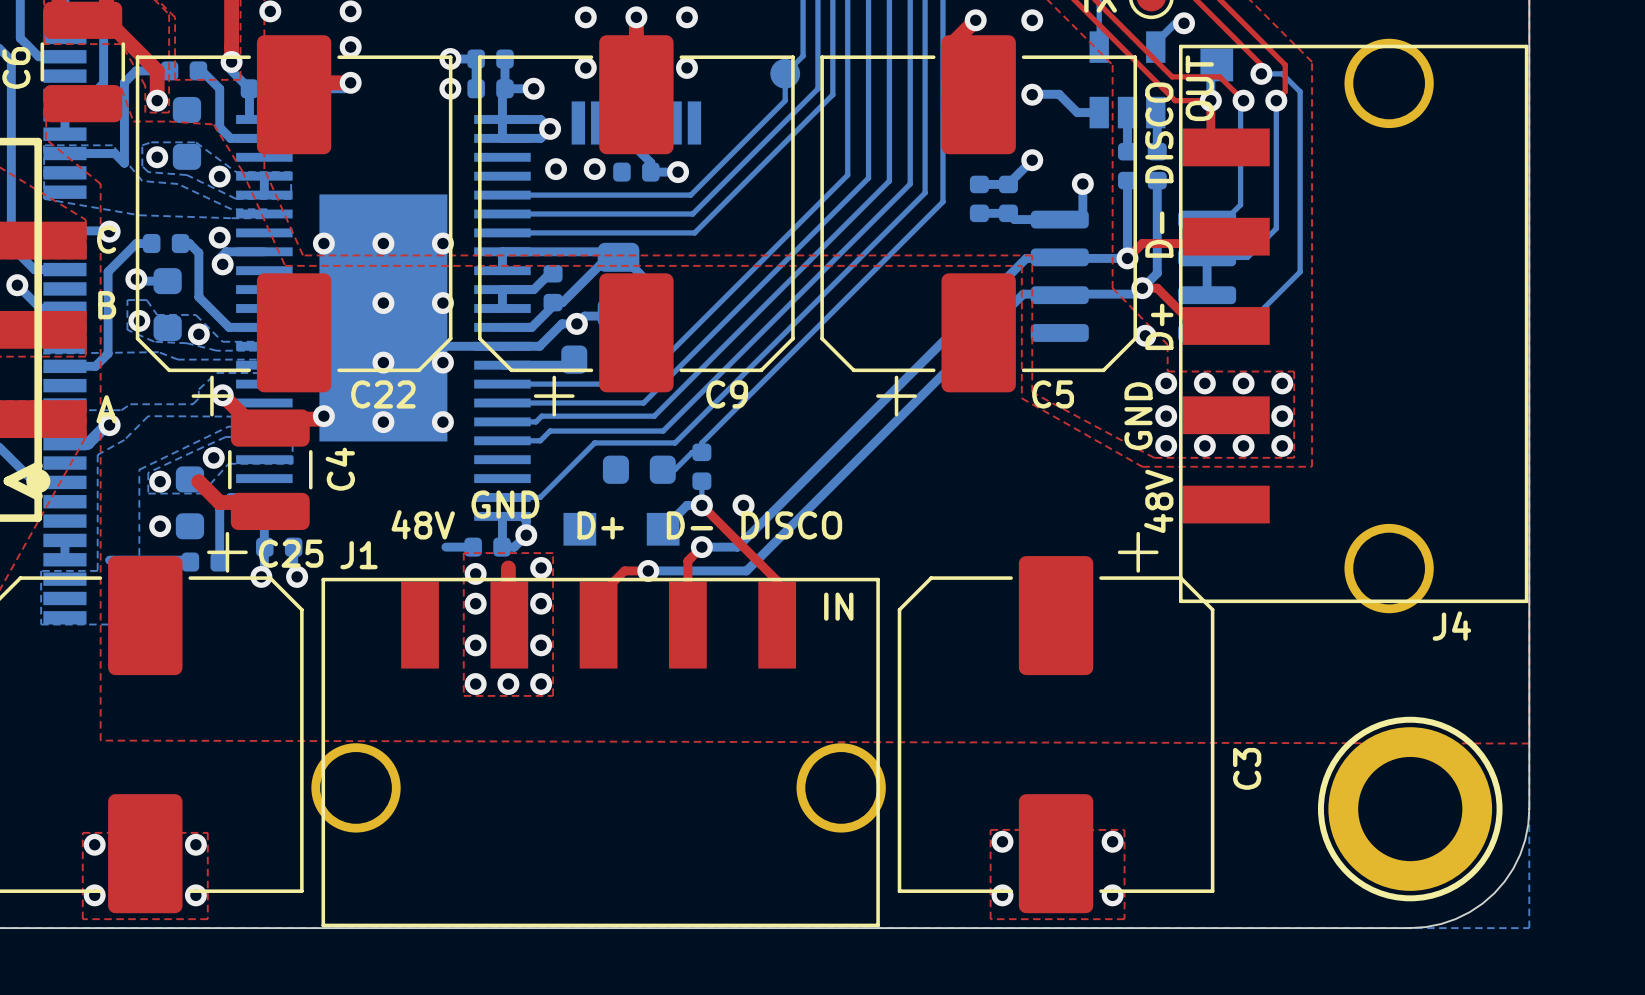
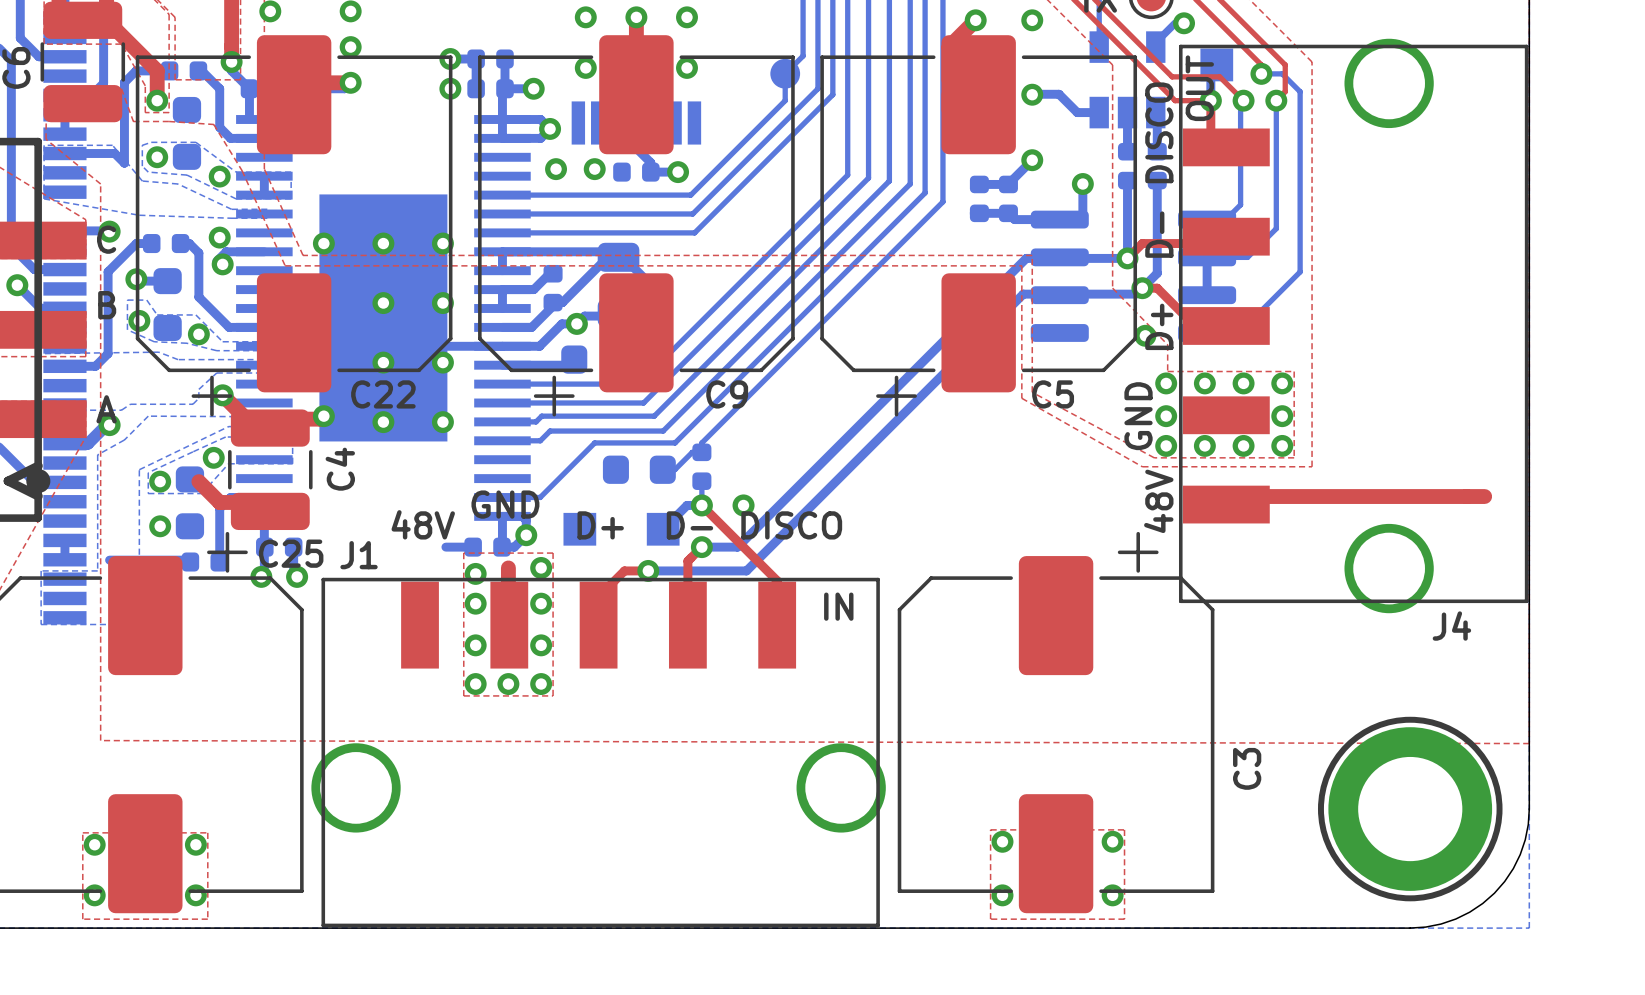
top track: none -> (1229, 496) (1484, 496)

